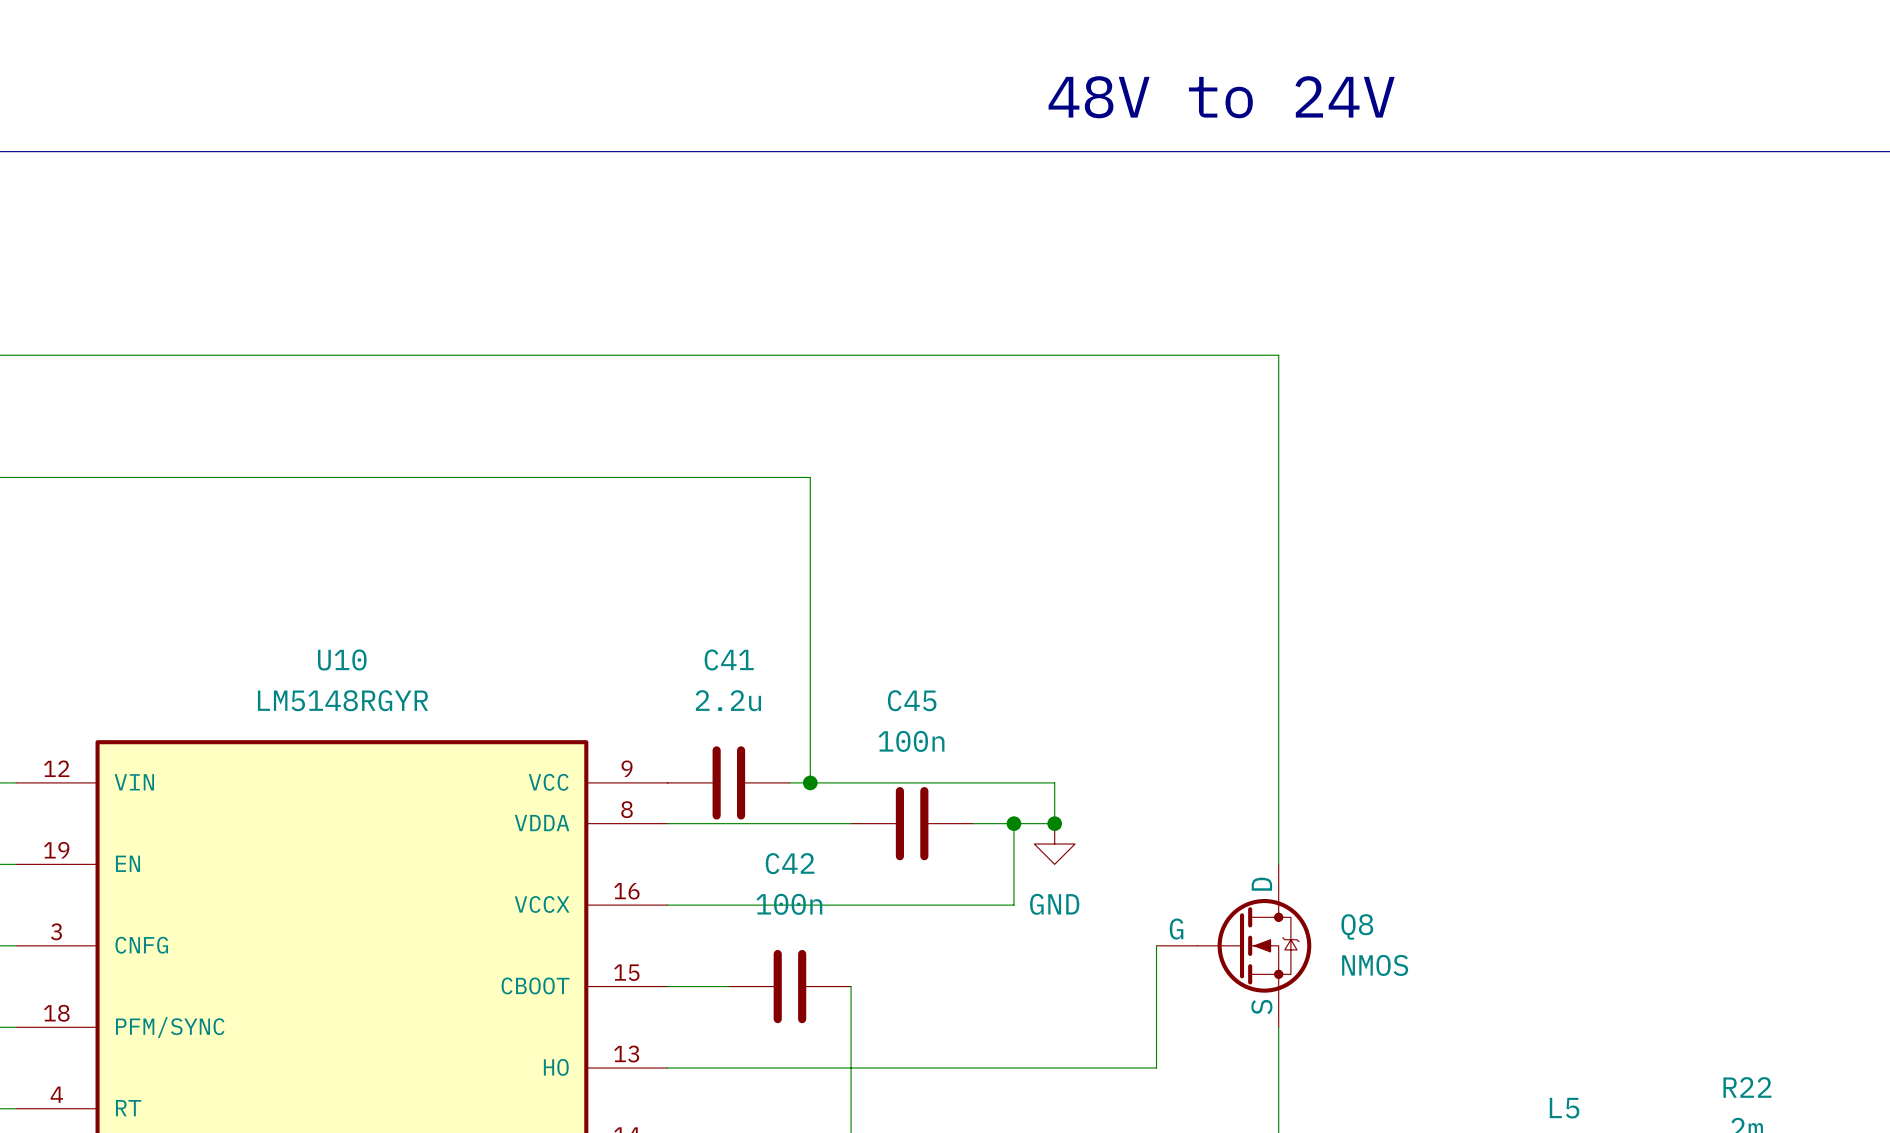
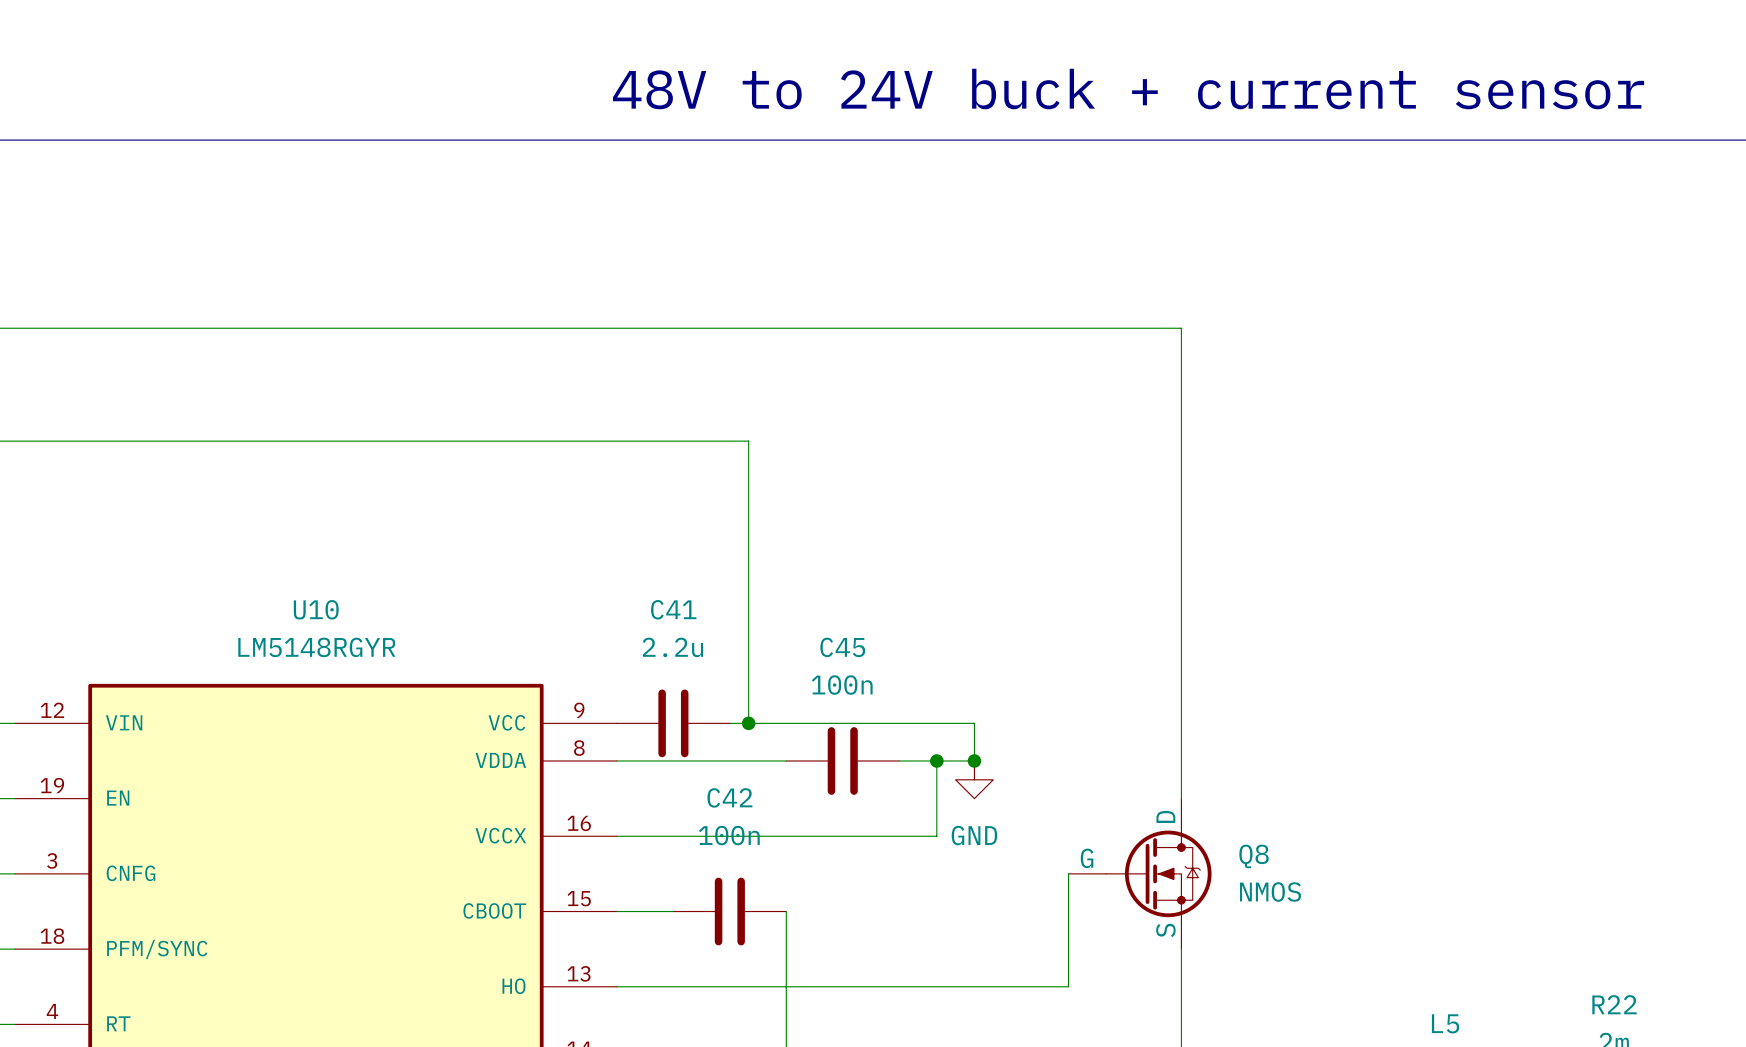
text: 48V to 24V (1221, 97) -> 48V to 24V buck + current sensor (1128, 89)

